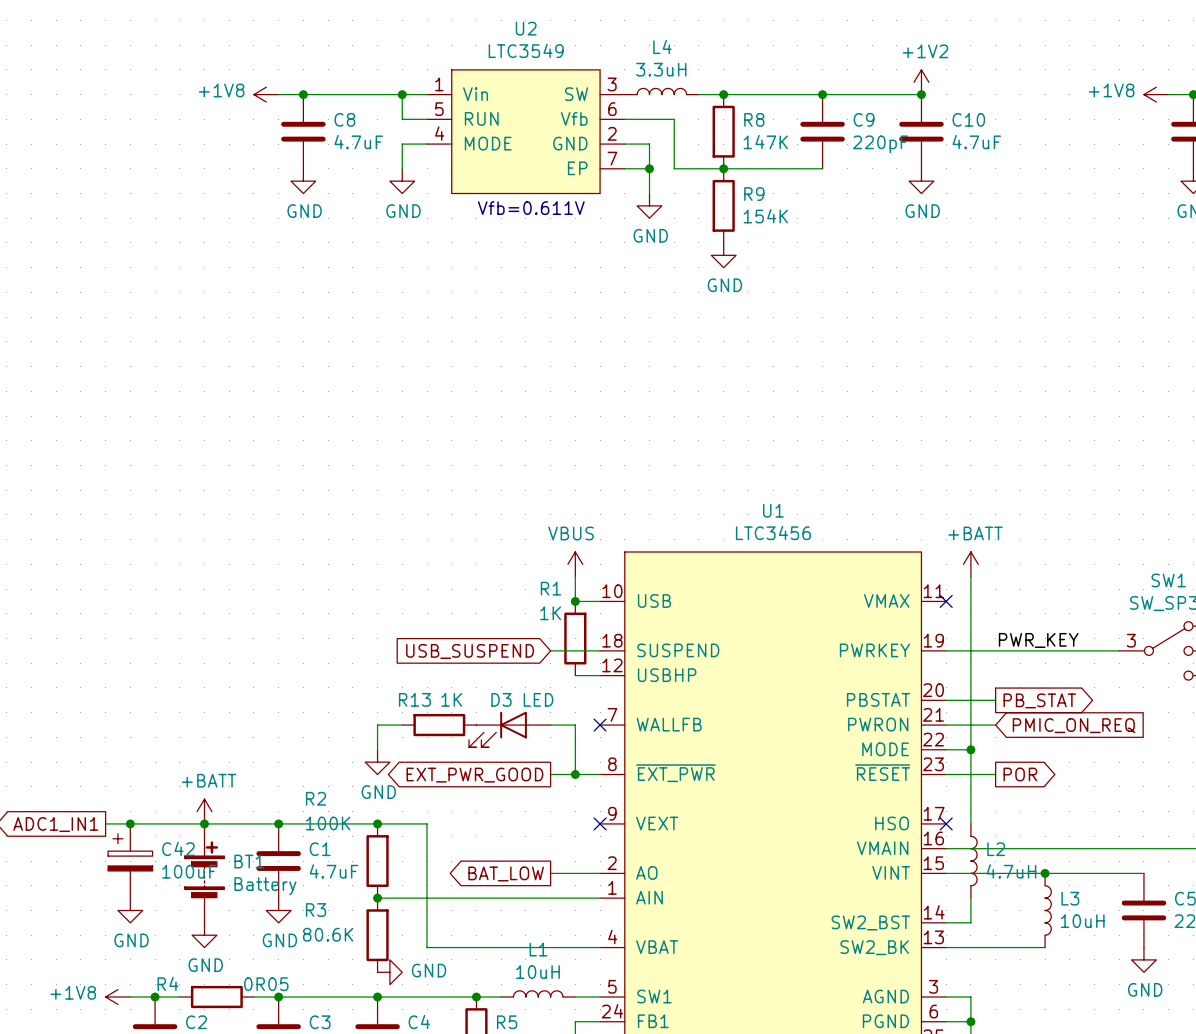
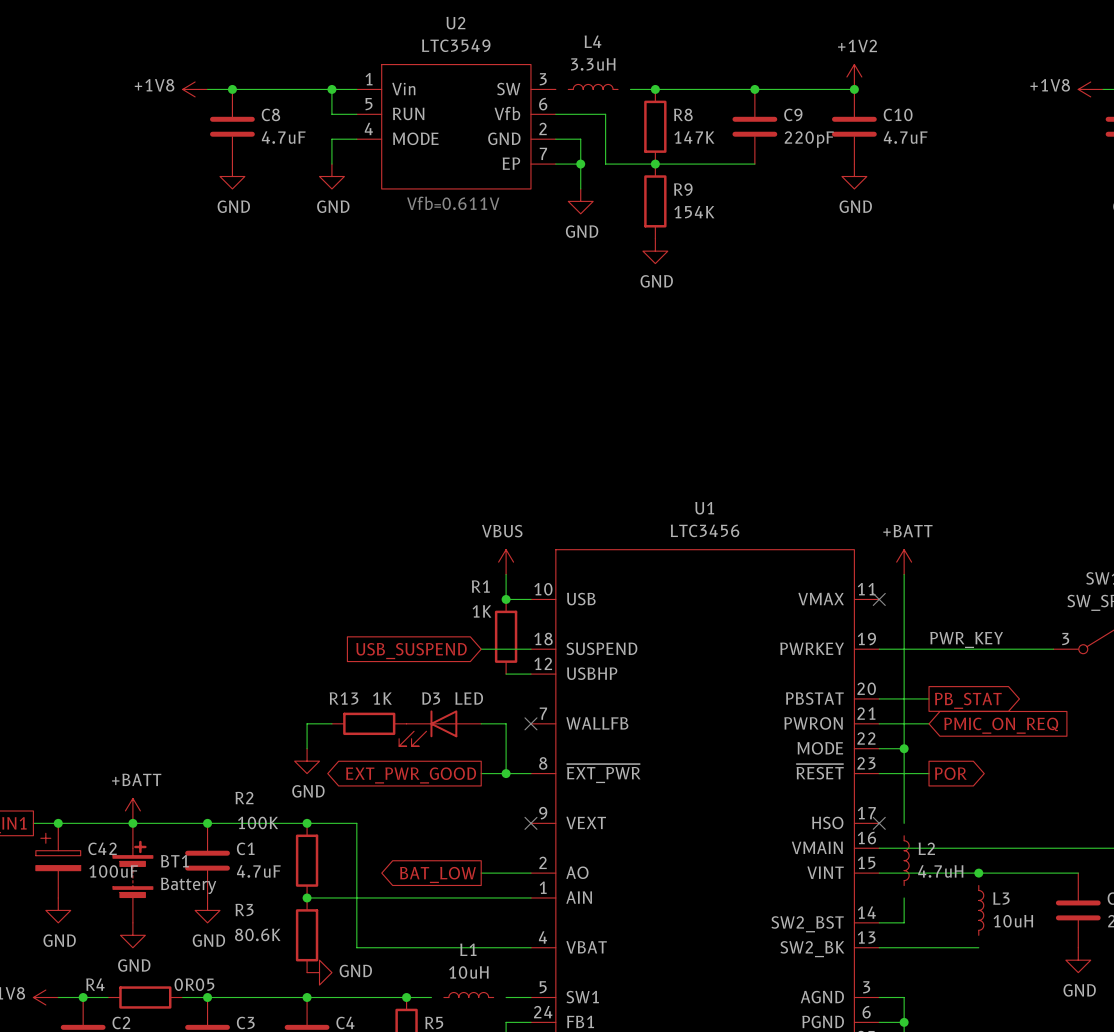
L4 symbol: [624, 88, 699, 95] -> [568, 84, 619, 90]
L2 symbol: [970, 823, 978, 899] -> [904, 835, 910, 886]
L3 symbol: [1045, 873, 1052, 948] -> [978, 885, 984, 936]
L1 symbol: [501, 990, 576, 998] -> [443, 992, 494, 998]

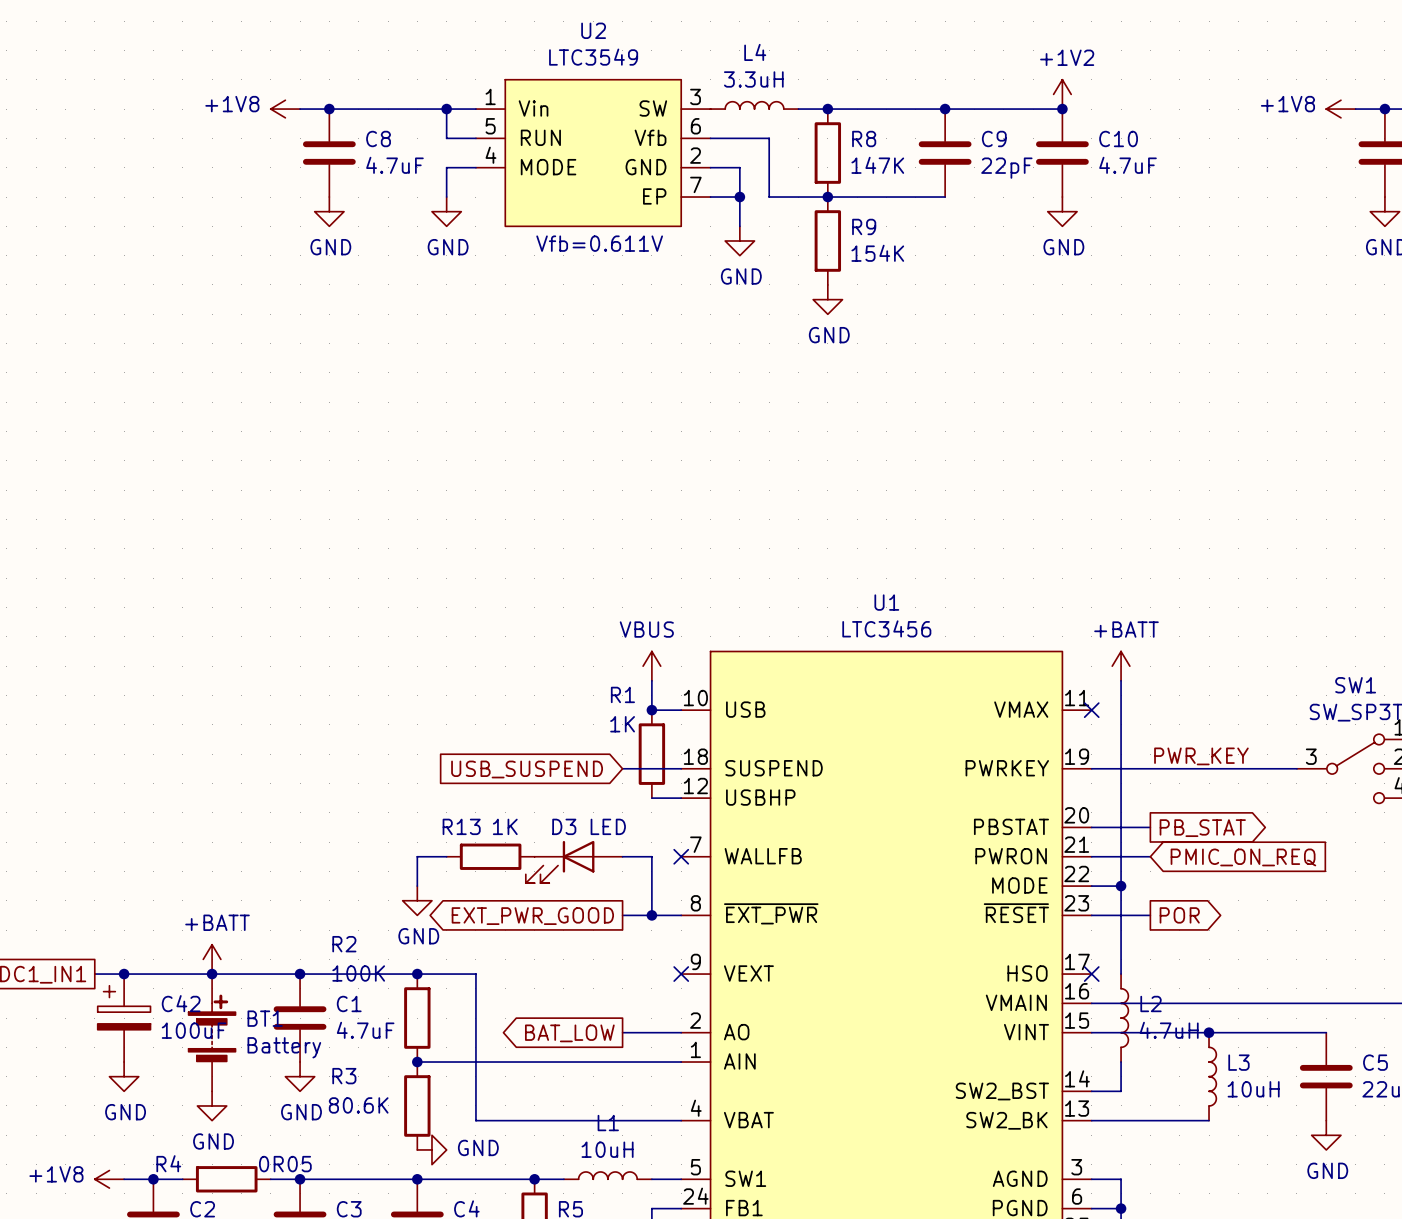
L4 symbol: [568, 84, 619, 90] -> [710, 101, 799, 110]
C9 value: 220pF (809, 139) -> 22pF (1006, 168)
L2 symbol: [904, 835, 910, 886] -> [1121, 974, 1129, 1063]
L3 symbol: [978, 885, 984, 936] -> [1209, 1032, 1217, 1121]
L1 symbol: [443, 992, 494, 998] -> [563, 1171, 652, 1180]

